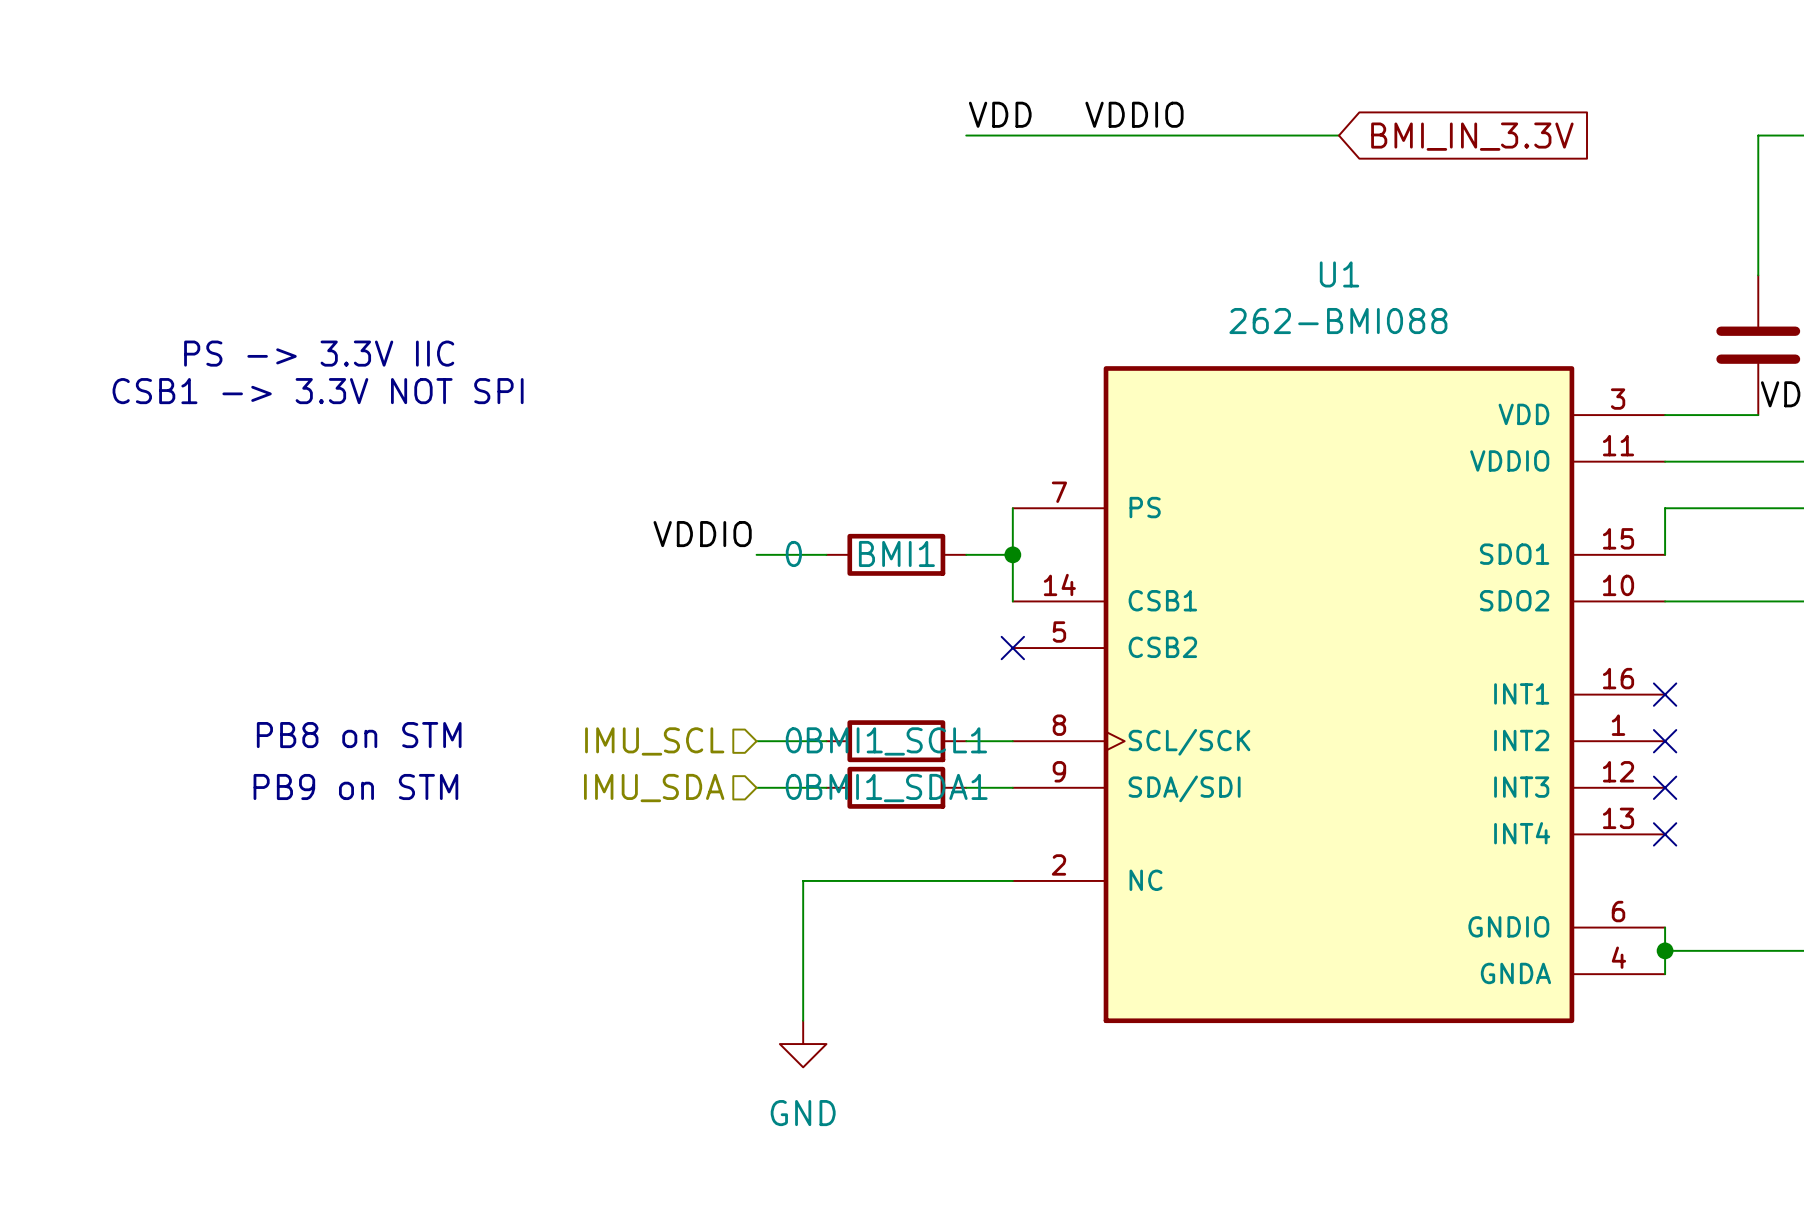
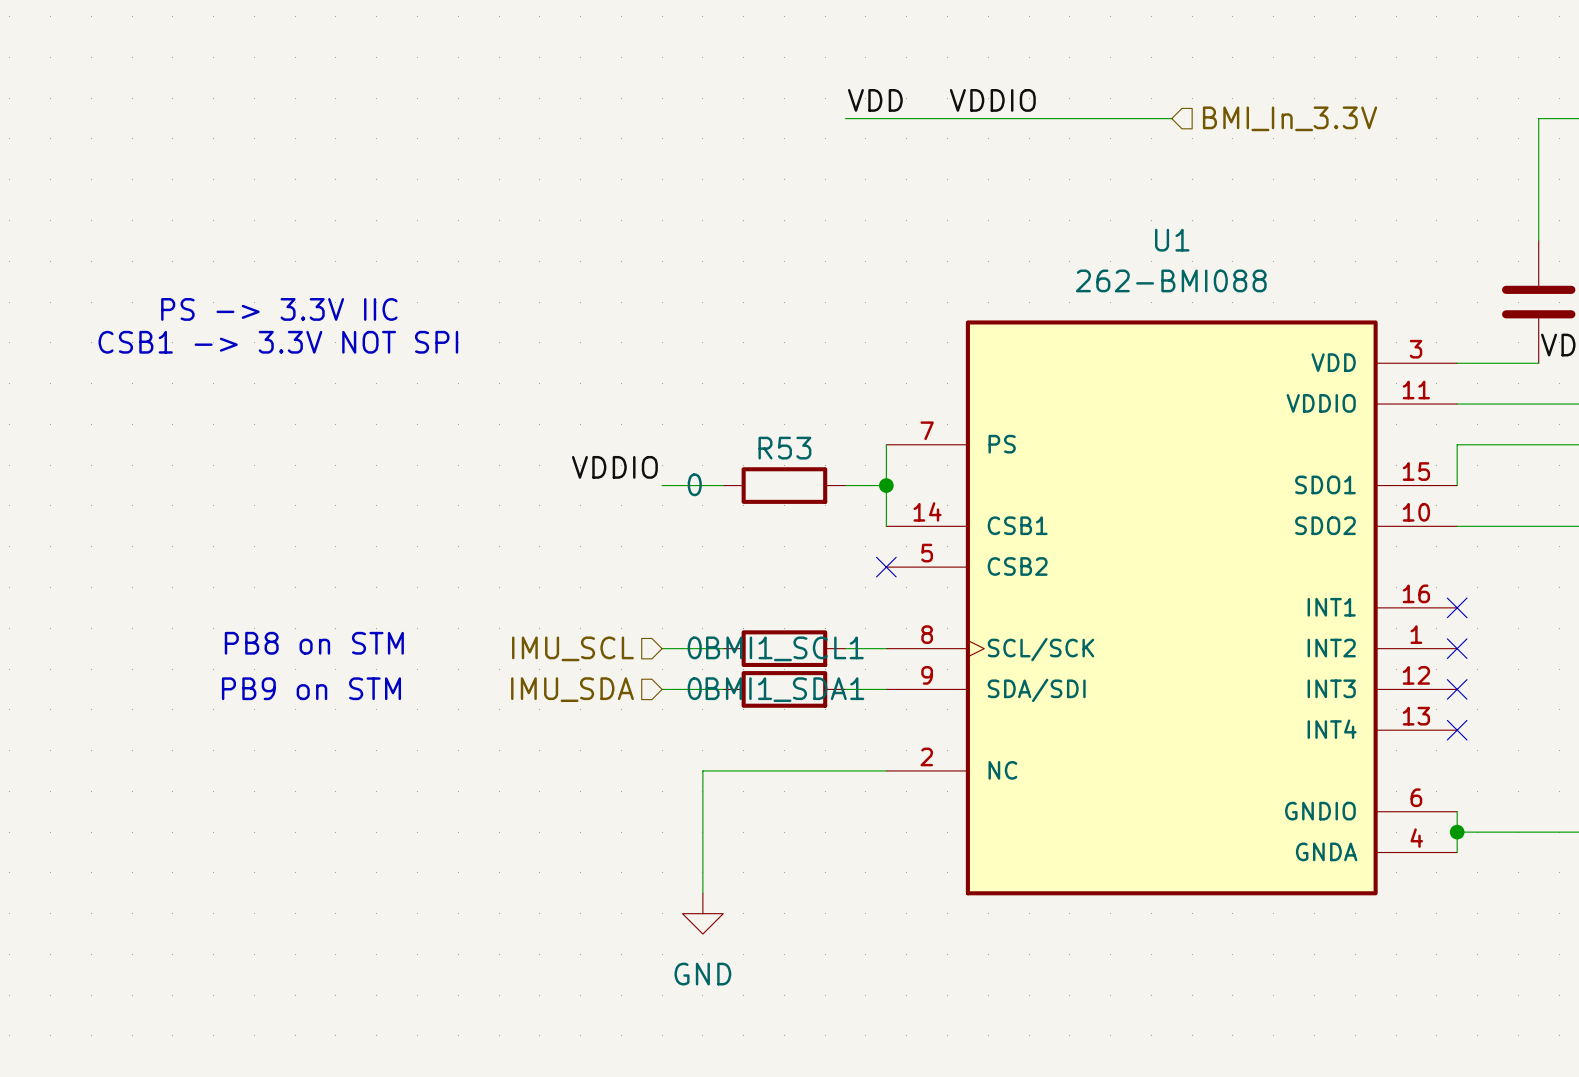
hierarchical label: none -> BMI_In_3.3V (1290, 118)
global label: BMI_IN_3.3V (1472, 136) -> none
BMI1 name: BMI1 (896, 553) -> R53 (784, 448)

